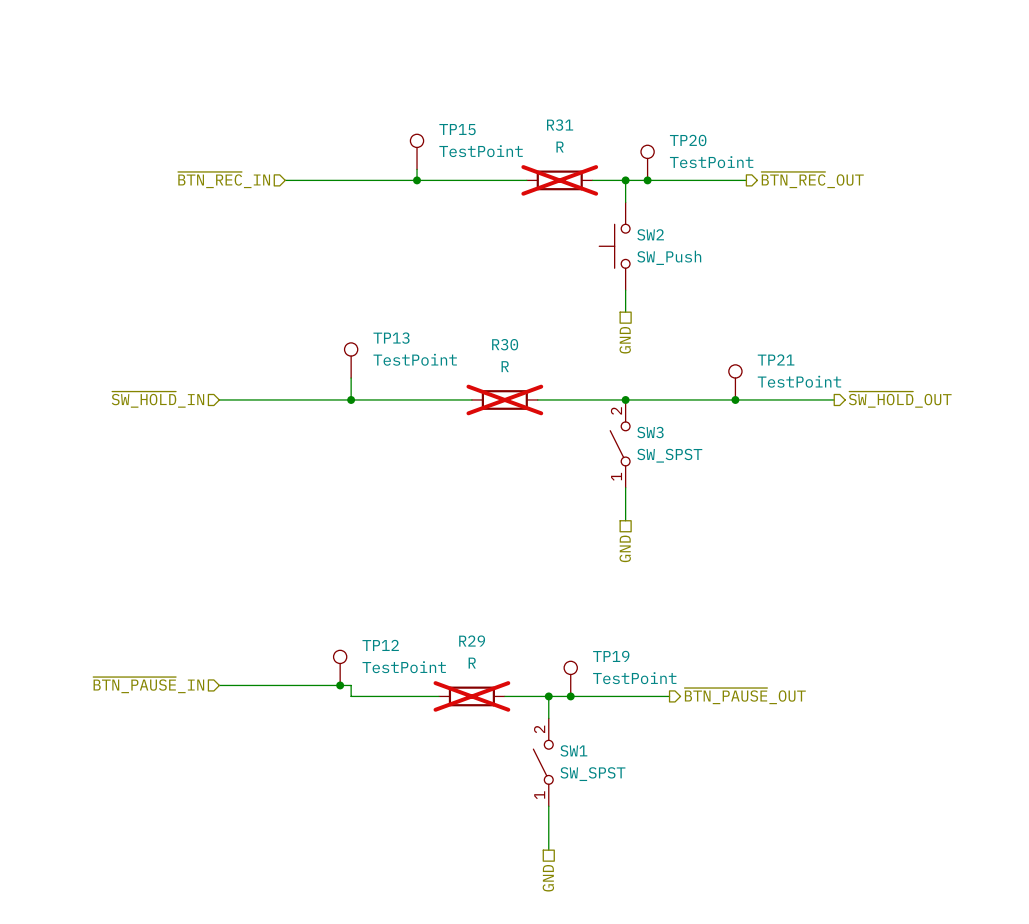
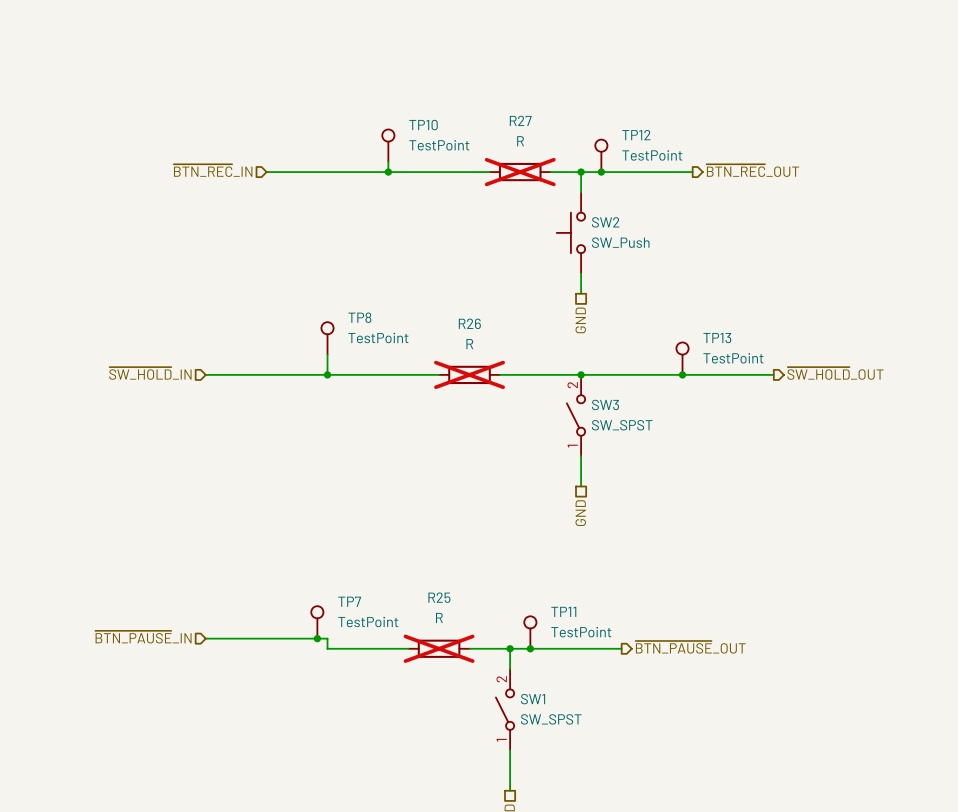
R31 name: R31 (560, 125) -> R27 (520, 120)
TP15 name: TP15 (457, 129) -> TP10 (423, 125)
TP20 name: TP20 (688, 140) -> TP12 (636, 135)
TP13 name: TP13 (391, 338) -> TP8 (359, 317)
R30 name: R30 (505, 344) -> R26 (469, 323)
TP21 name: TP21 (776, 359) -> TP13 (717, 338)
R29 name: R29 (472, 641) -> R25 (439, 597)
TP12 name: TP12 (380, 645) -> TP7 (349, 601)
TP19 name: TP19 (611, 656) -> TP11 (563, 611)

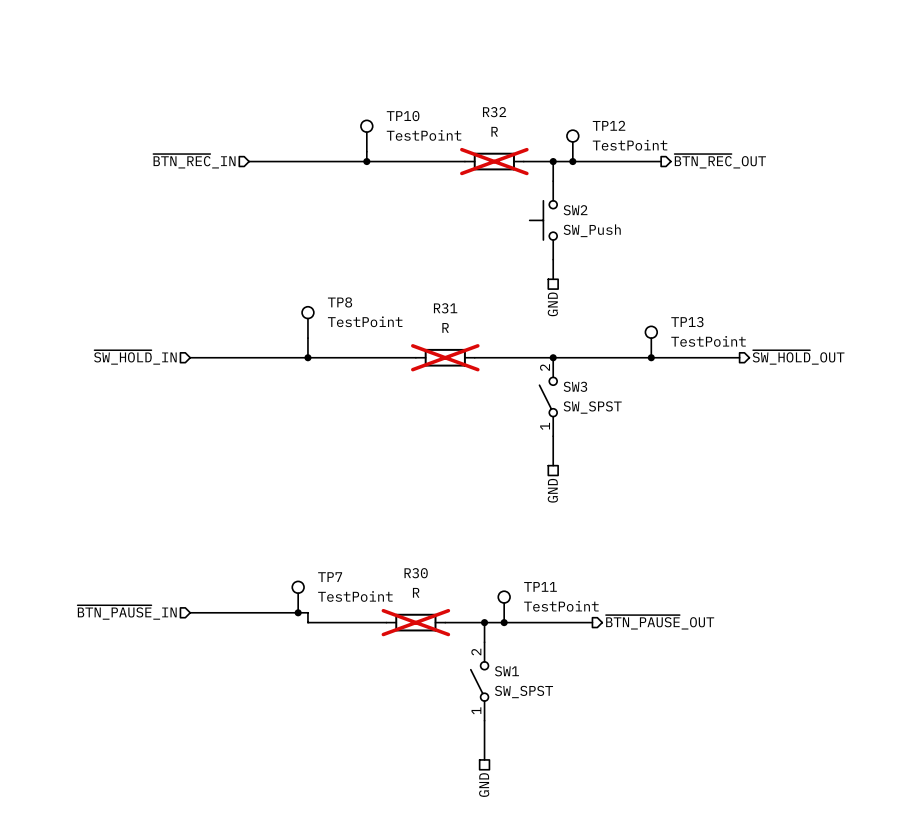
R27 name: R27 (520, 120) -> R32 (494, 112)
R26 name: R26 (469, 323) -> R31 (445, 308)
R25 name: R25 (439, 597) -> R30 (416, 573)

